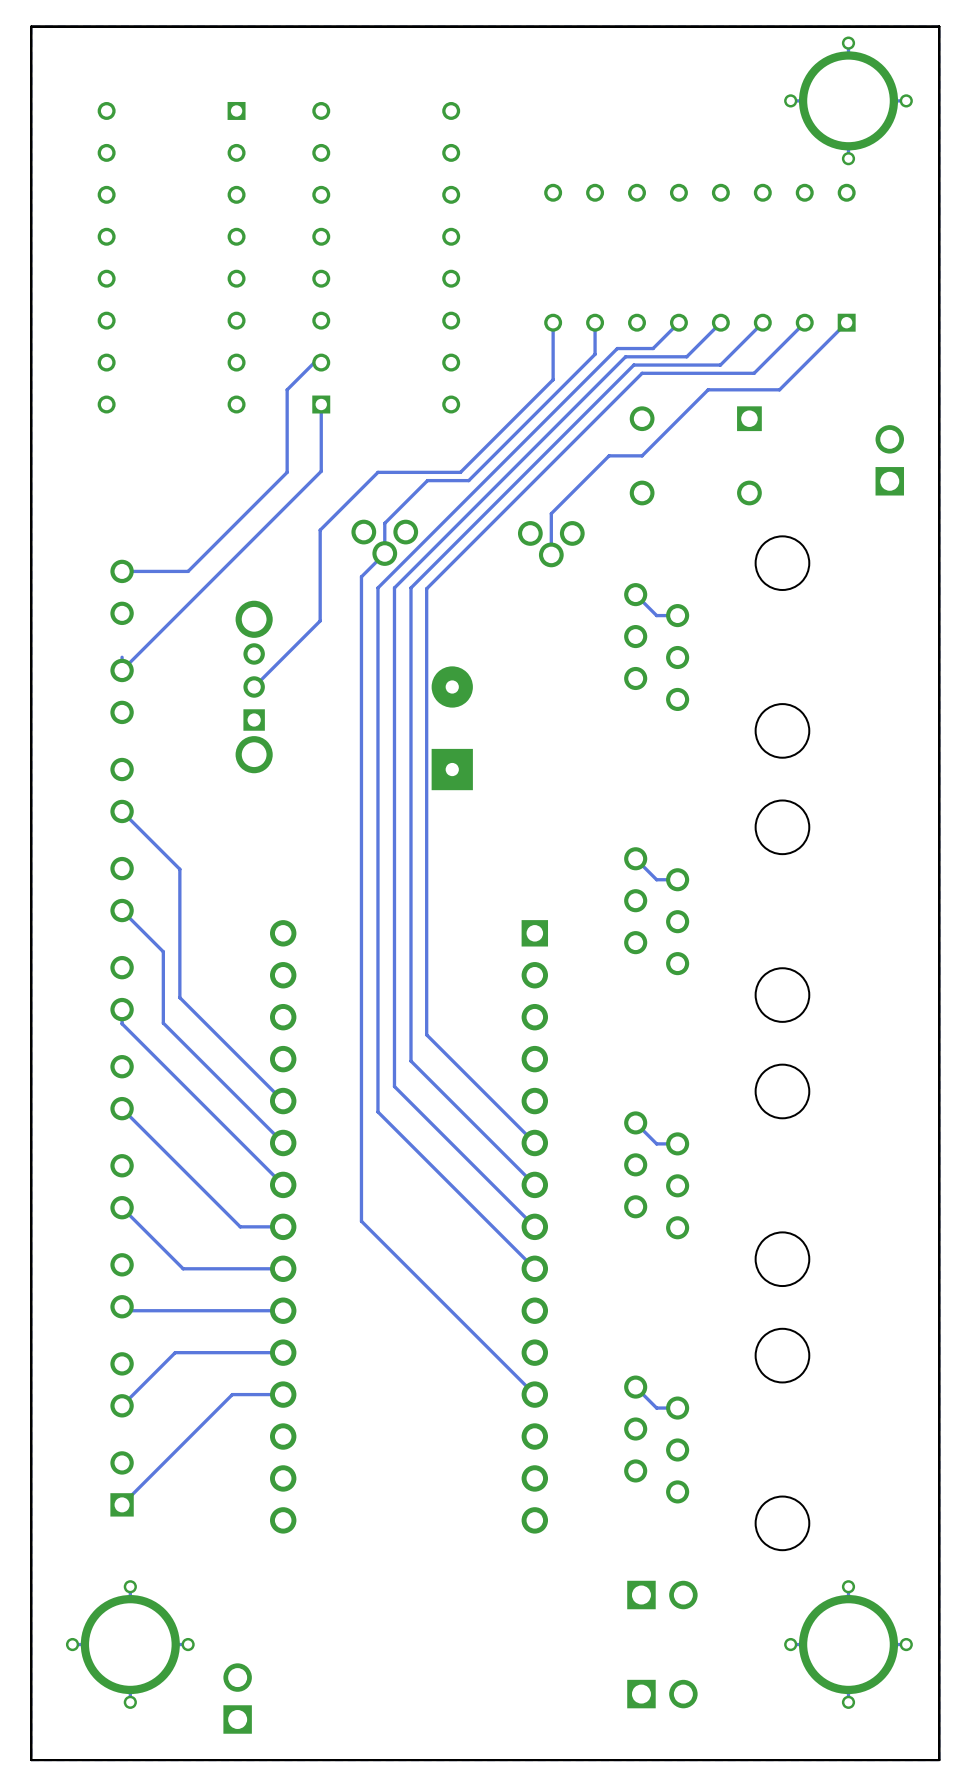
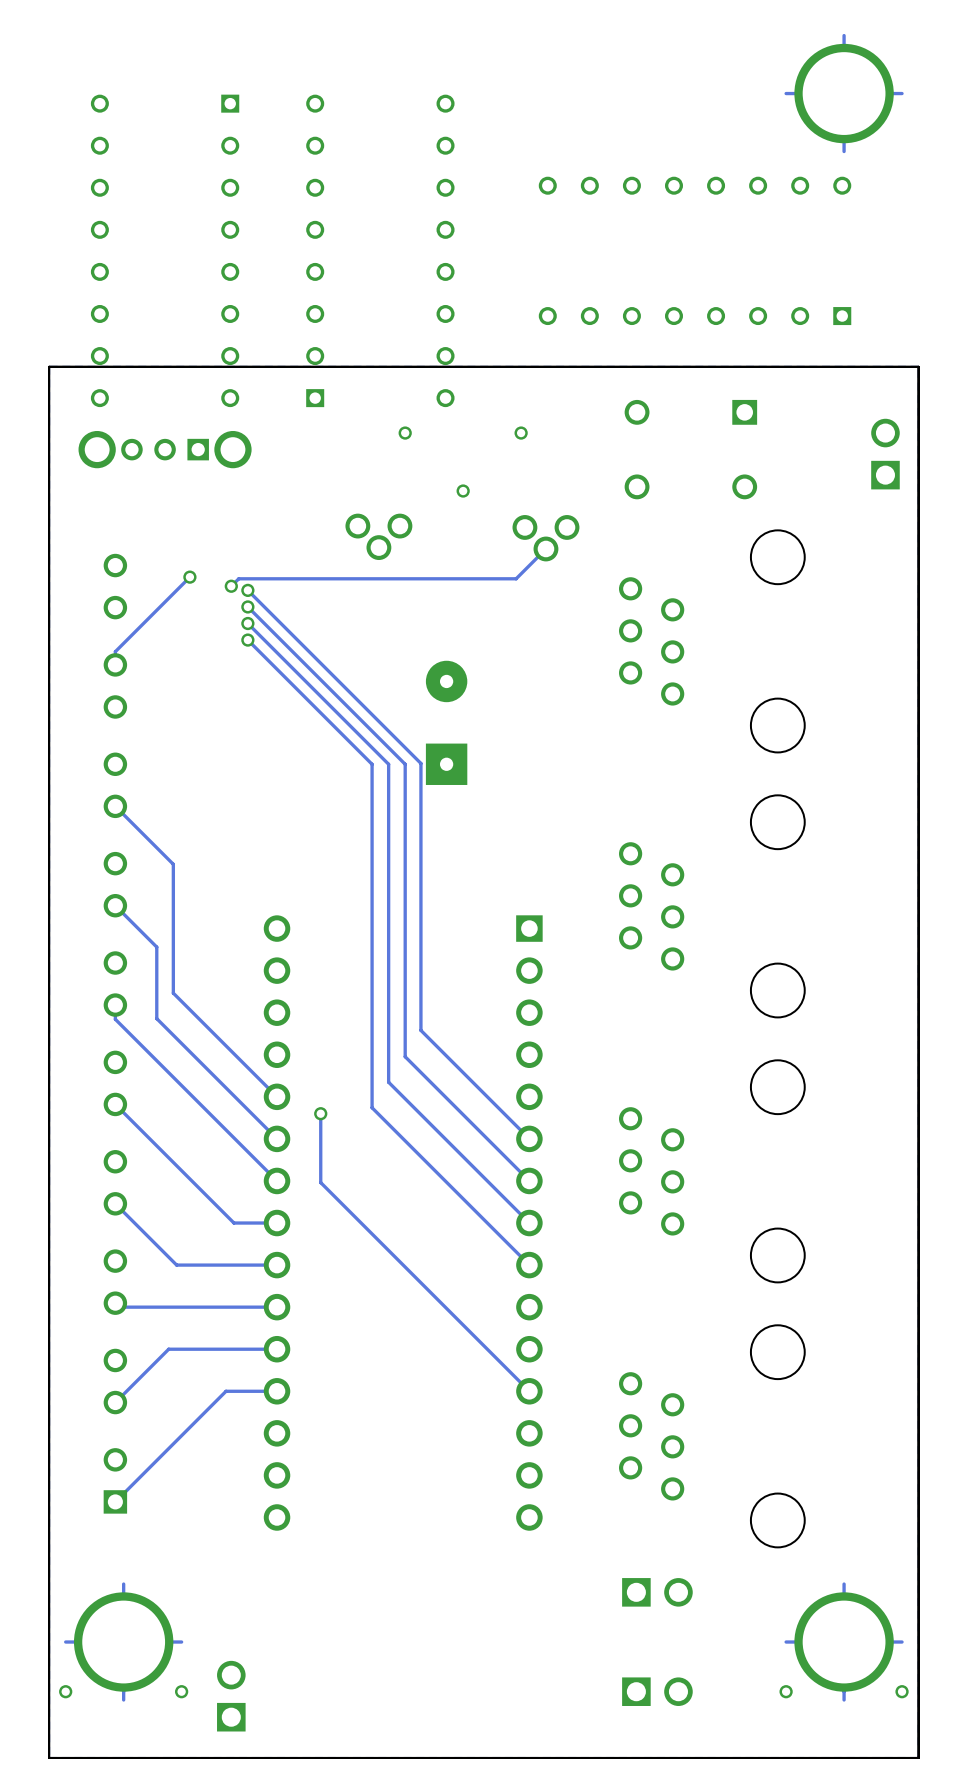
via: (848, 43) -> none
via: (790, 100) -> none
via: (906, 100) -> none
via: (848, 158) -> none
track: (553, 322) (553, 379) (460, 472) (377, 472) (320, 530) (320, 620) (254, 686) -> none
track: (595, 322) (595, 354) (468, 480) (427, 480) (384, 523) (384, 553) (361, 576) (361, 1221) -> (320, 1113) (320, 1182) (355, 1217)
track: (678, 322) (653, 348) (617, 348) (377, 587) (377, 769) -> (247, 640) (372, 764)
track: (720, 322) (686, 356) (625, 356) (394, 587) (394, 769) -> (247, 623) (388, 764)
track: (762, 322) (720, 365) (633, 365) (410, 587) (410, 769) -> (247, 606) (405, 764)
track: (804, 322) (754, 373) (642, 373) (426, 588) (426, 768) -> (247, 590) (420, 763)
track: (846, 322) (779, 389) (708, 389) (642, 455) (609, 455) (551, 513) (551, 554) -> (231, 586) (238, 578) (516, 578) (545, 548)
track: (321, 362) (314, 362) (287, 389) (287, 472) (188, 571) (122, 571) -> none
track: (321, 404) (321, 471) (122, 670) -> none
via: none -> (405, 433)
via: none -> (521, 433)
via: none -> (463, 491)
track: none -> (189, 577) (115, 651)
via: none -> (189, 577)
via: none -> (231, 586)
track: (635, 594) (656, 615) (677, 615) -> none
via: none -> (247, 590)
via: none -> (247, 606)
via: none -> (247, 623)
via: none -> (247, 640)
part rotation: 0° (254, 686) -> 90° counterclockwise (165, 449)
part position: (254, 686) -> (165, 449)
track: (635, 858) (656, 879) (677, 879) -> none
via: none -> (320, 1113)
track: (635, 1122) (656, 1143) (677, 1143) -> none
track: (635, 1387) (656, 1408) (677, 1408) -> none
via: (130, 1586) -> none
via: (848, 1586) -> none
via: (72, 1644) -> none
via: (188, 1644) -> none
via: (790, 1644) -> none
via: (906, 1644) -> none
via: none -> (65, 1691)
via: none -> (181, 1691)
via: none -> (786, 1691)
via: none -> (902, 1691)
via: (130, 1702) -> none
via: (848, 1702) -> none
board edge: (922, 1760) (939, 1760) (939, 26) (31, 26) (31, 1760) (56, 1760) -> (918, 1757) (918, 366) (49, 366) (49, 1757)

